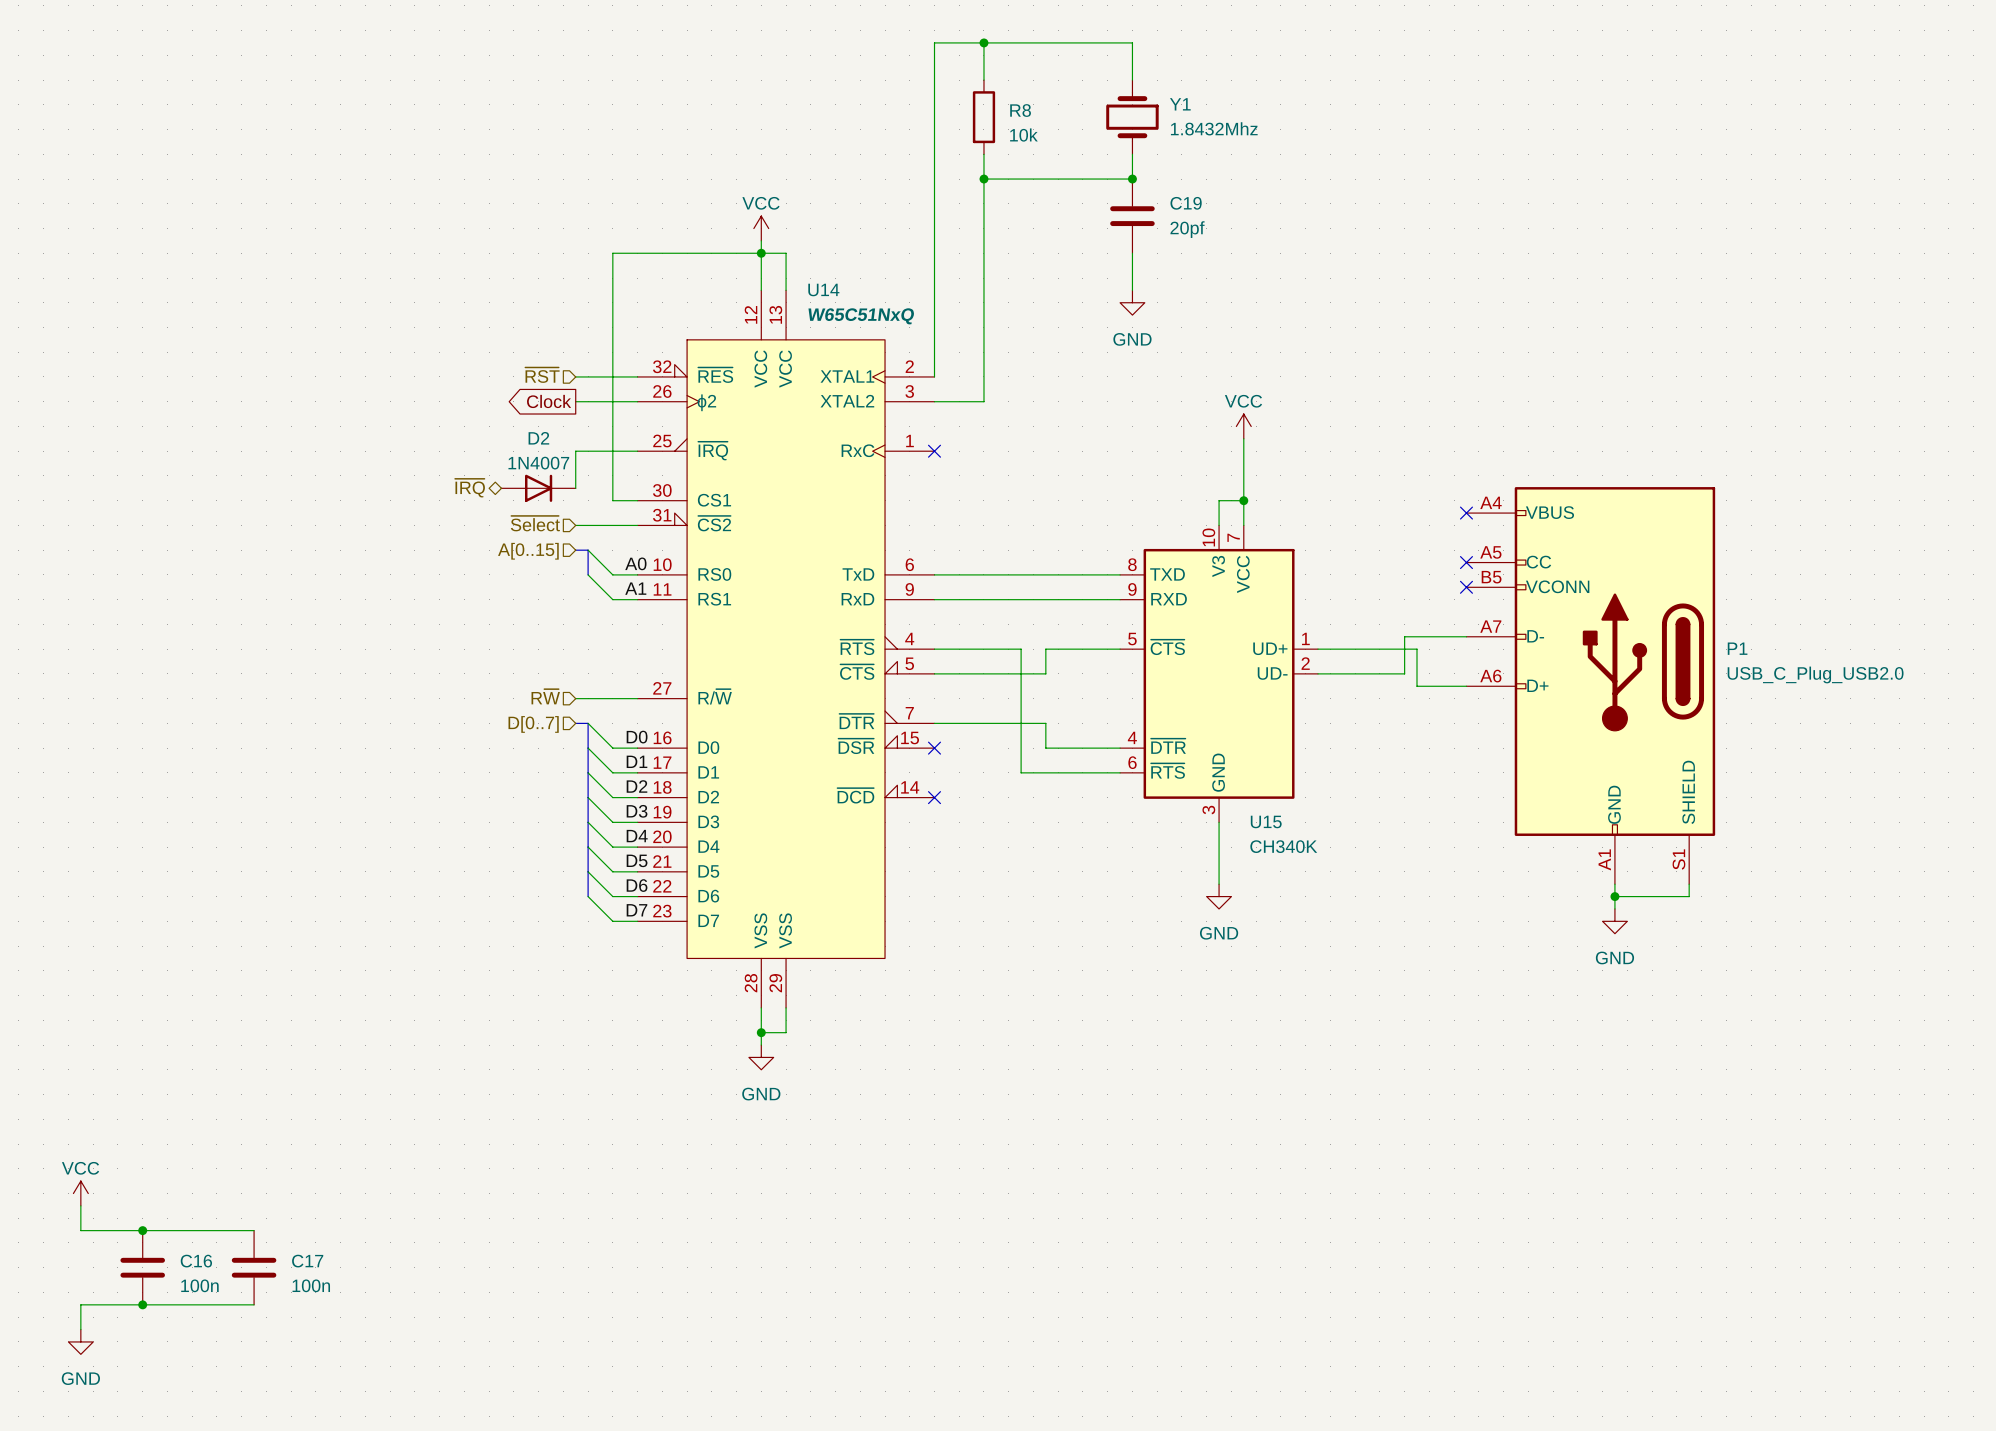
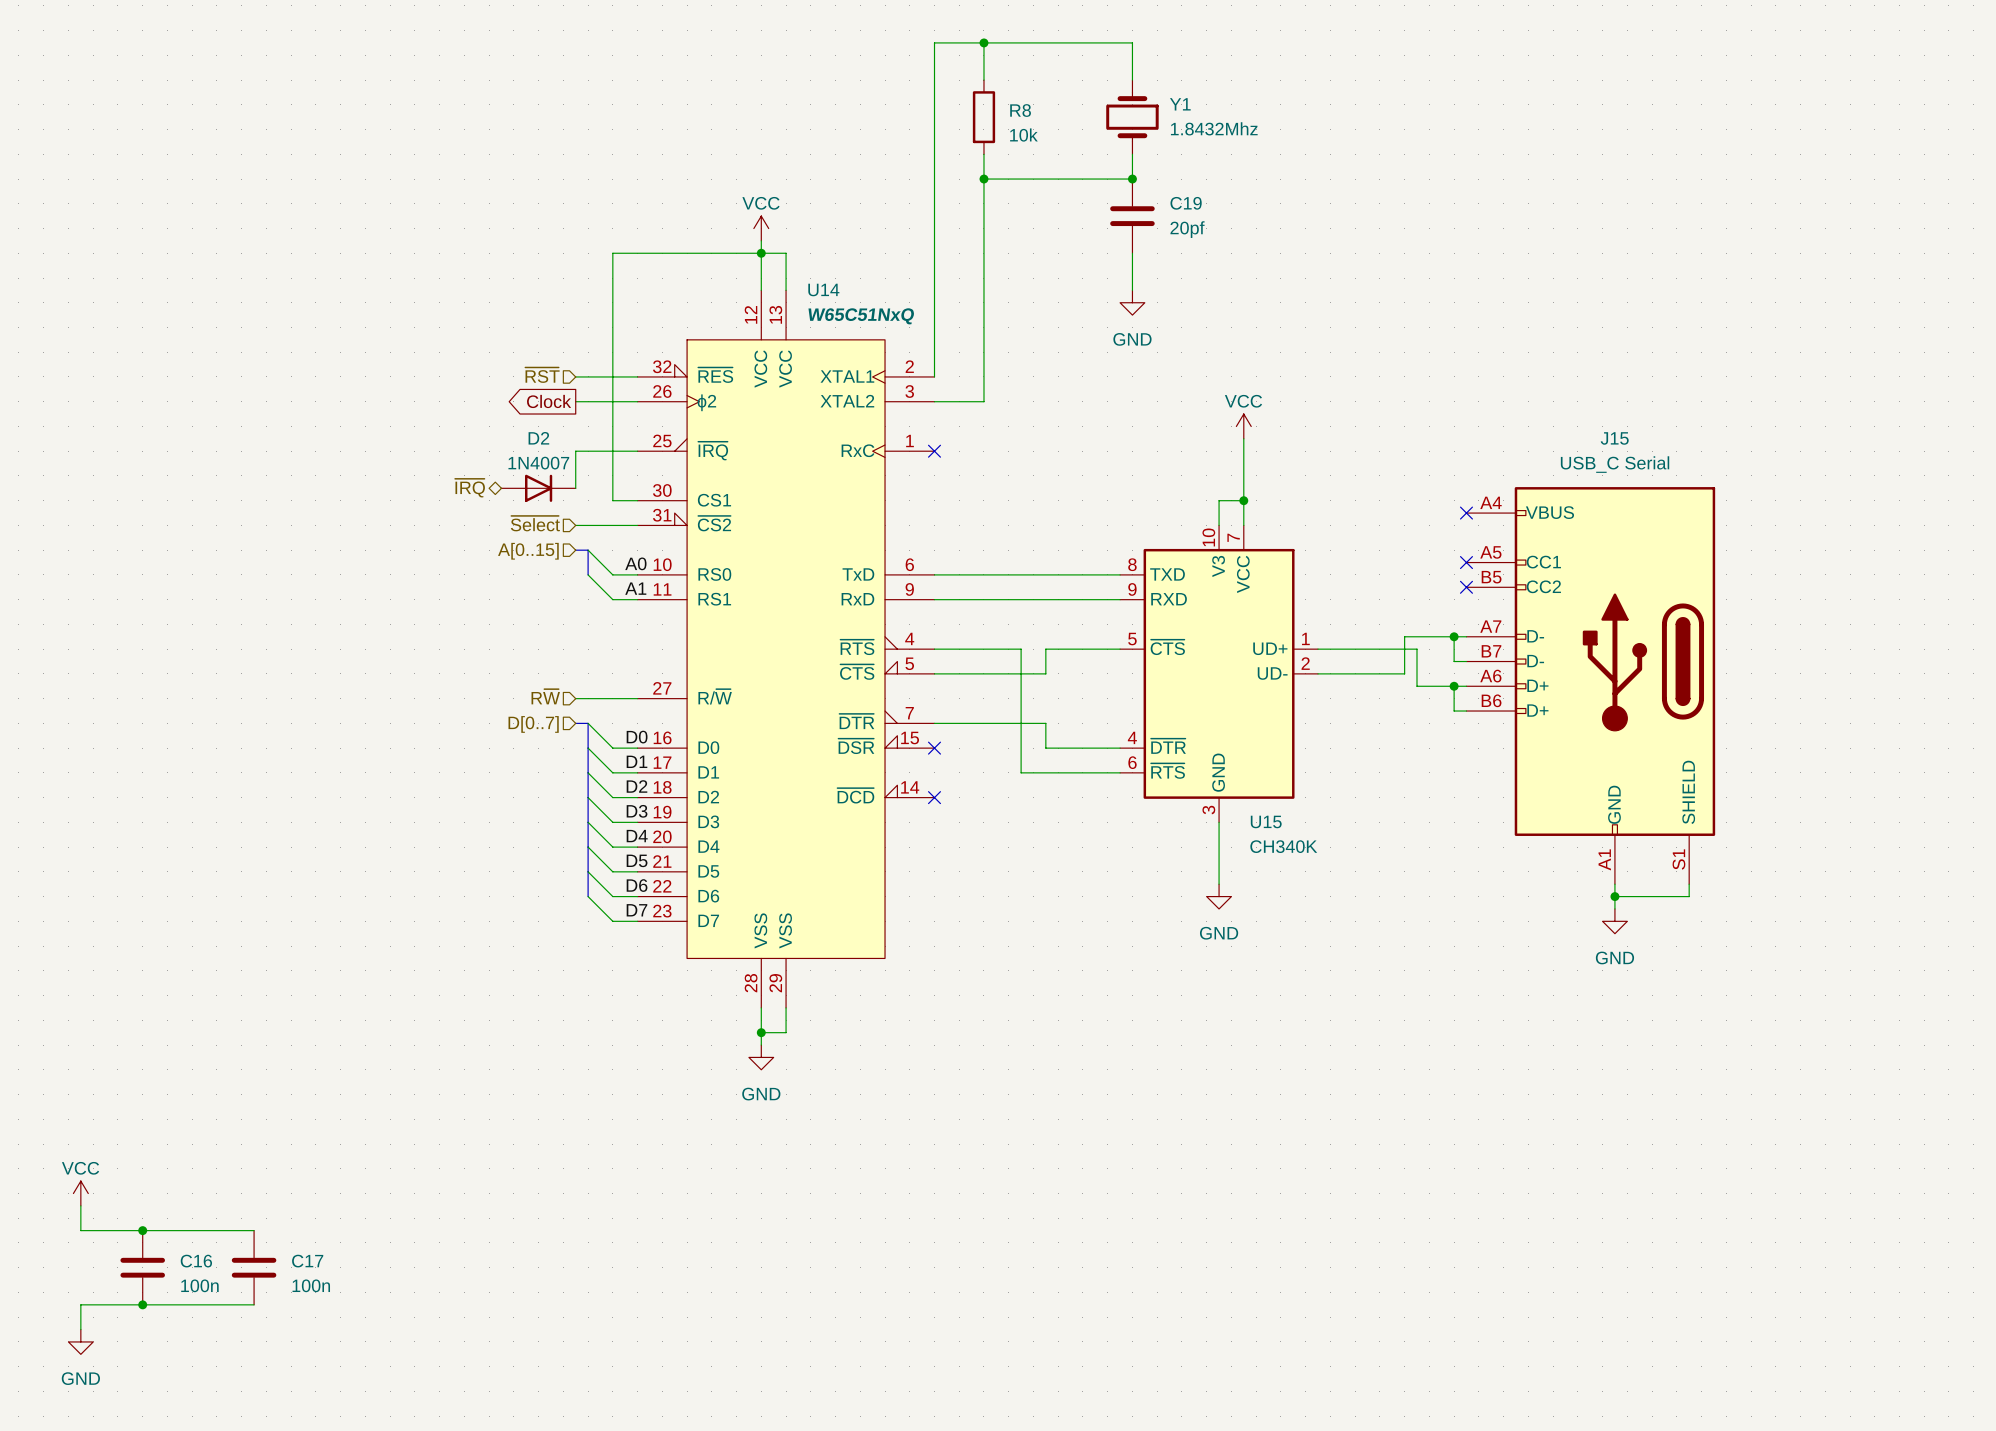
wire: none -> (1454, 636) (1454, 661) (1466, 661)
junction: none -> (1454, 636)
P1: USB_C_Plug_USB2.0 (1590, 685) -> none
J15: none -> USB_C Serial (1590, 685)
wire: none -> (1454, 686) (1454, 711) (1466, 711)
junction: none -> (1454, 686)

